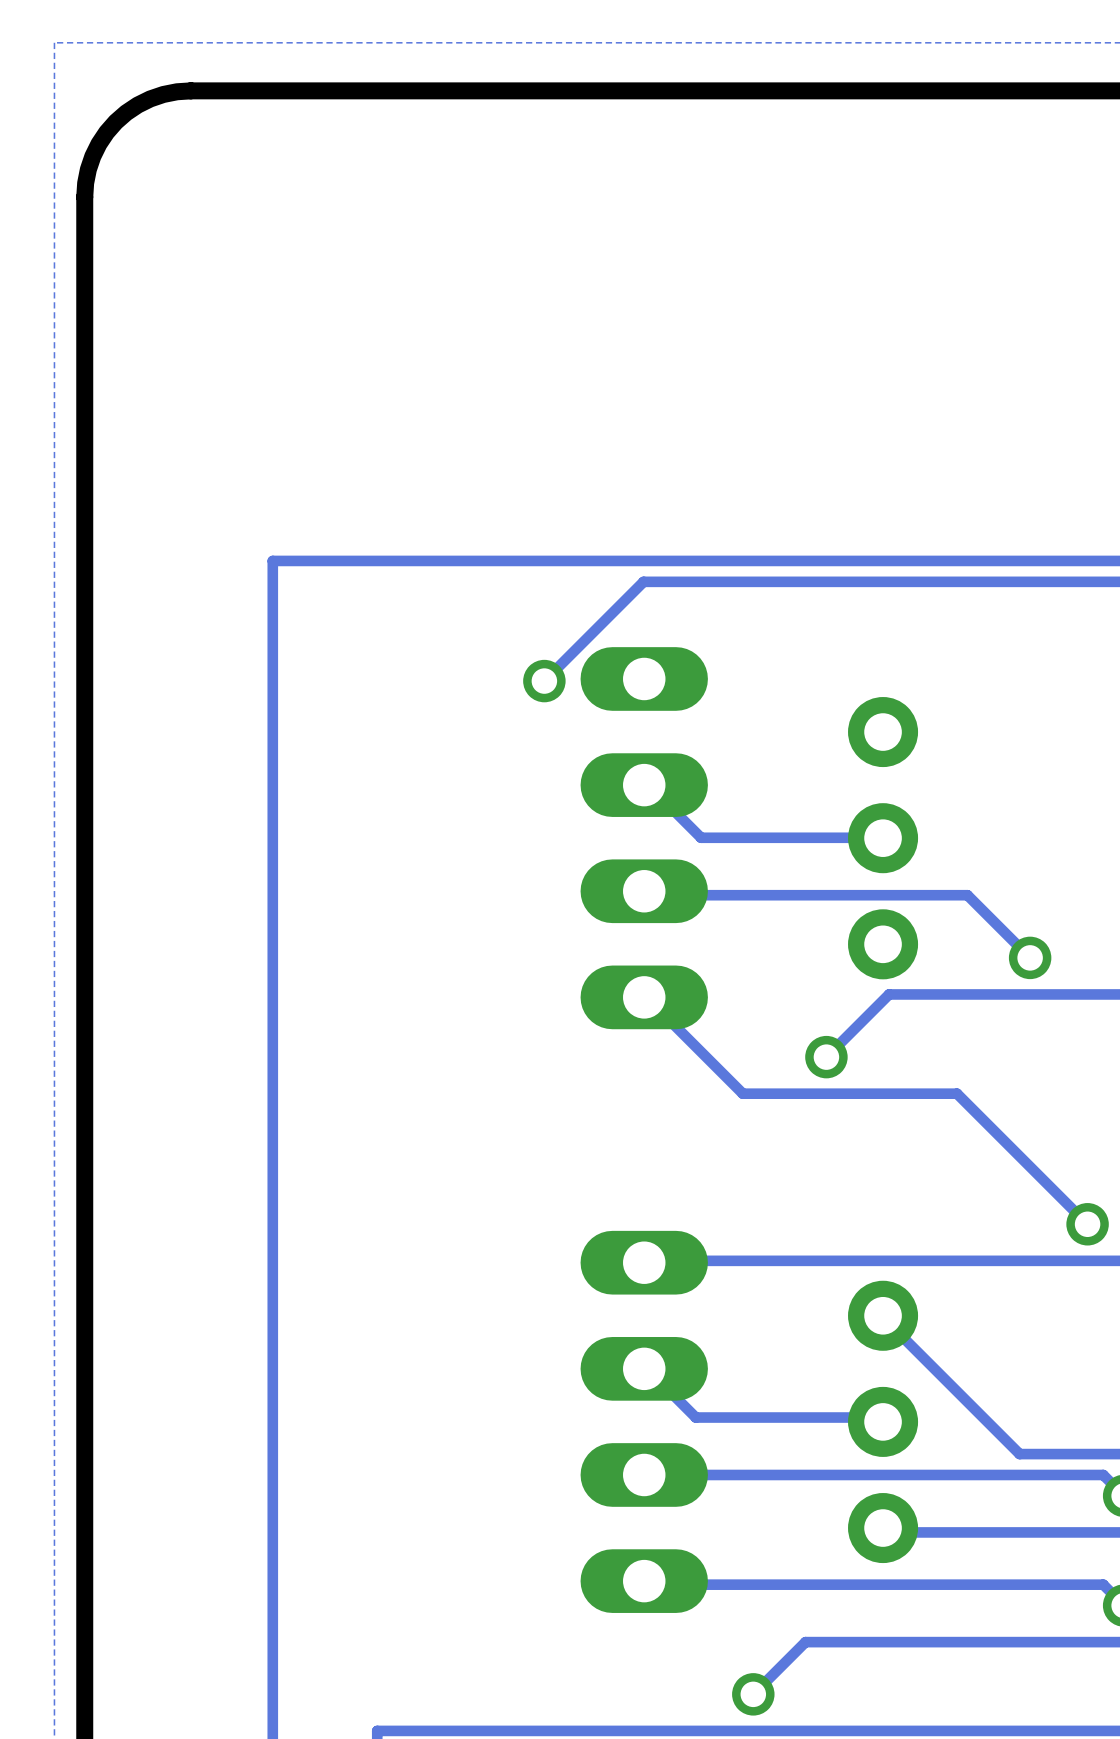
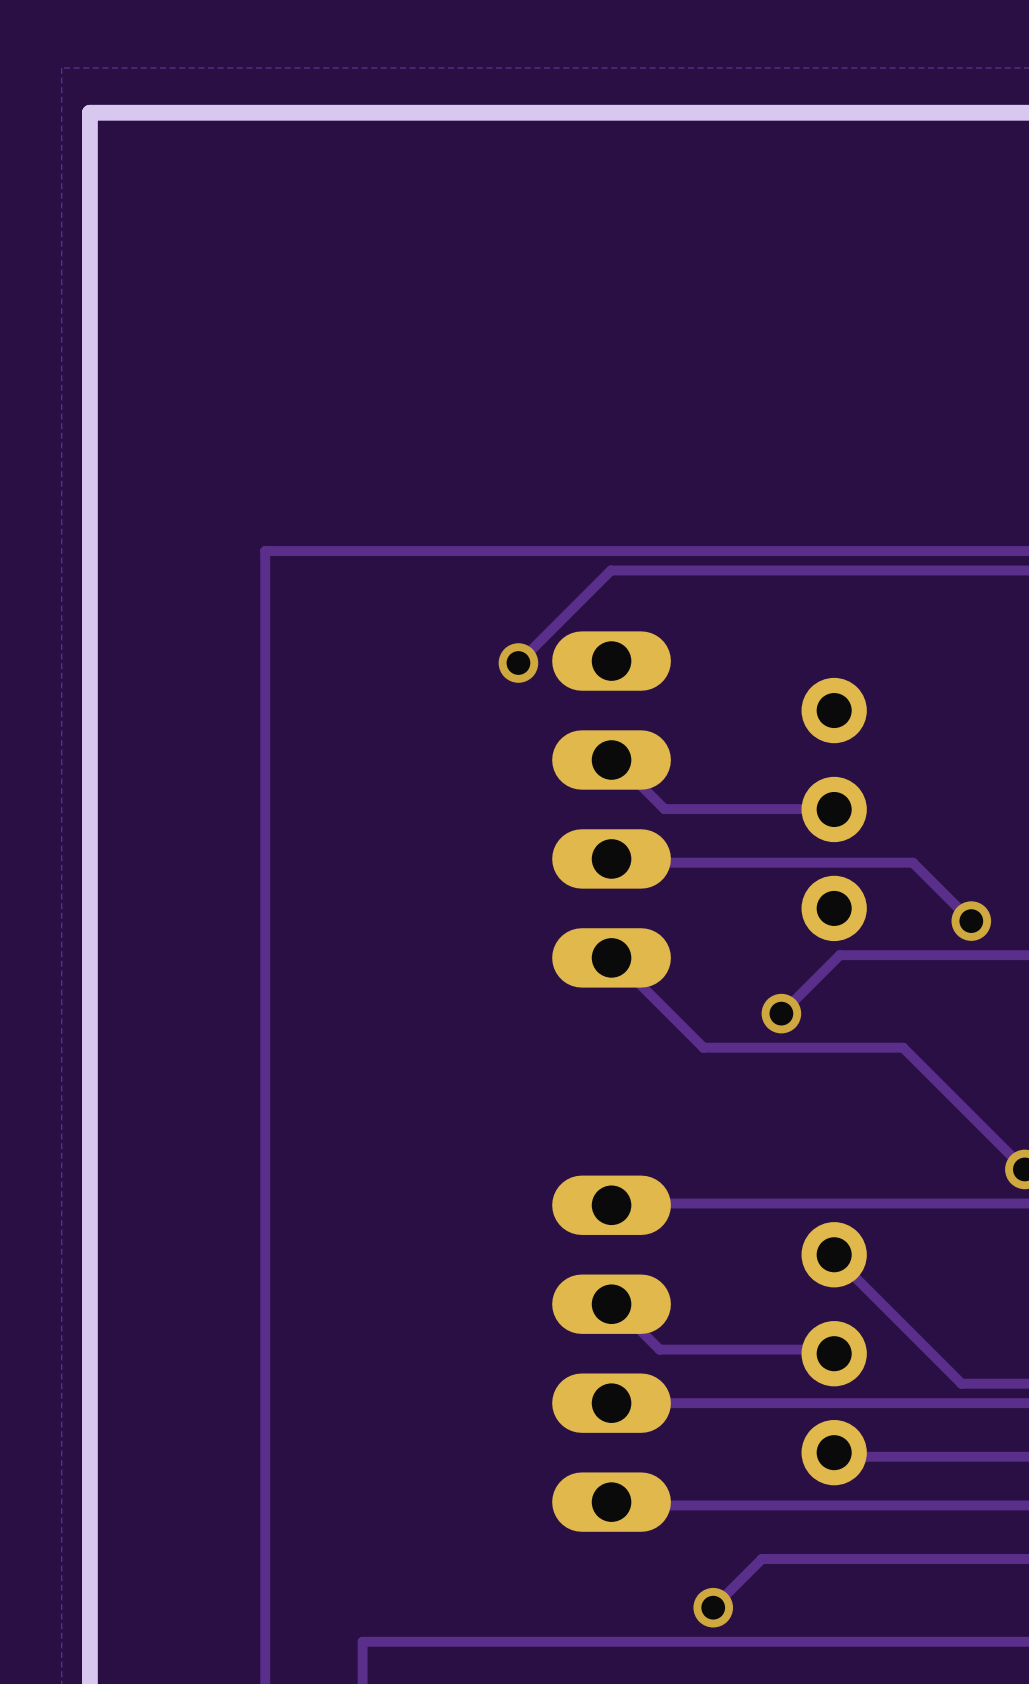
board edge: (190, 90) (163, 94) (150, 98) (126, 112) (115, 121) (106, 132) (92, 156) (88, 169) (84, 196) -> (188, 112) (89, 112) (89, 211)

